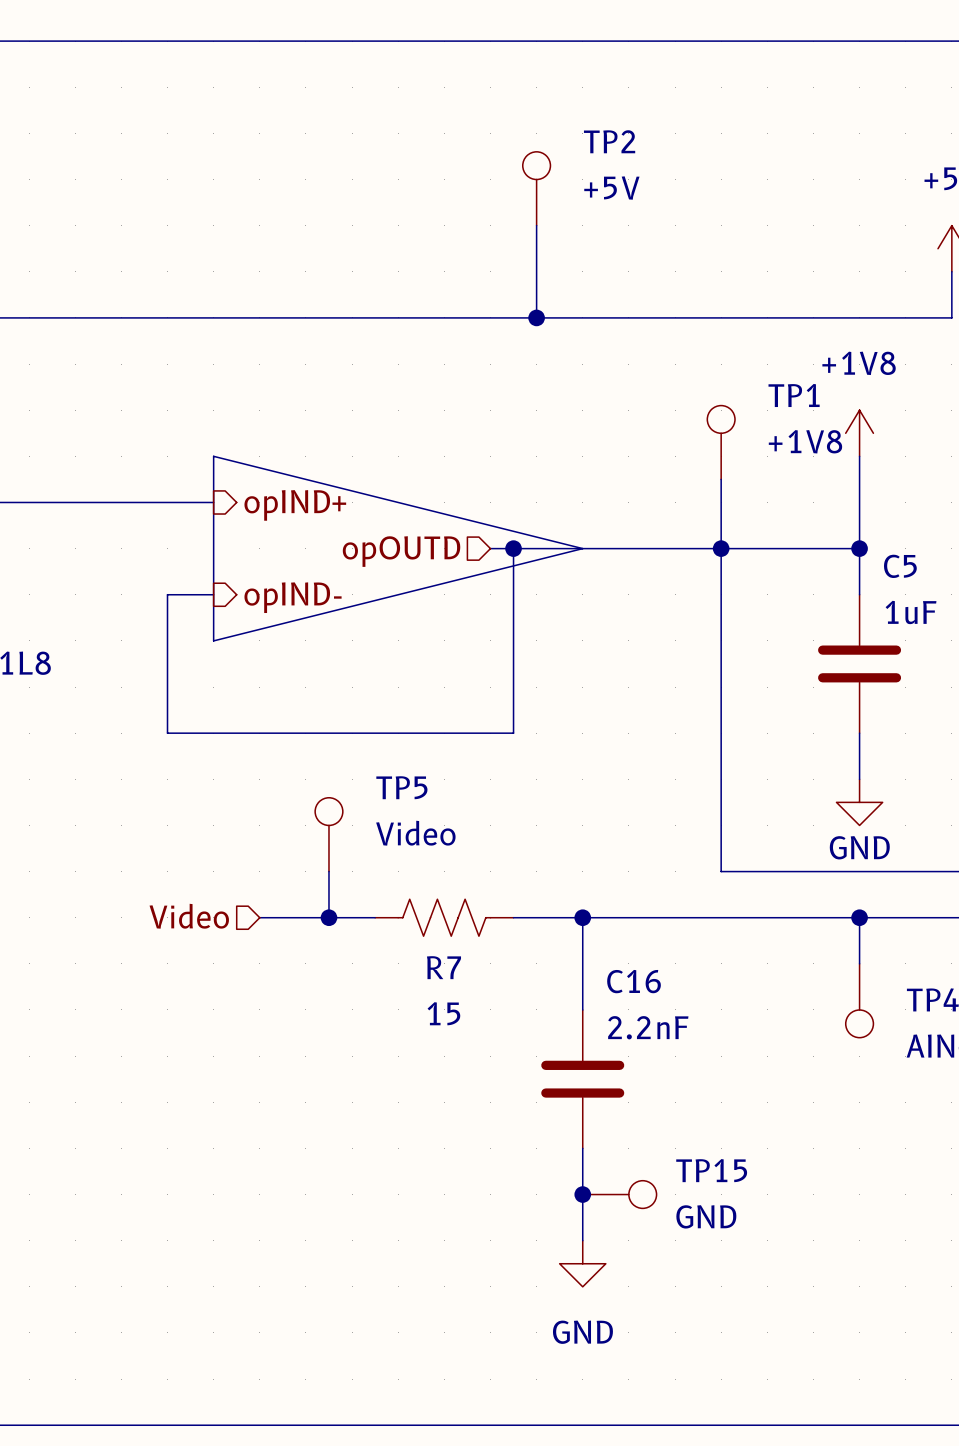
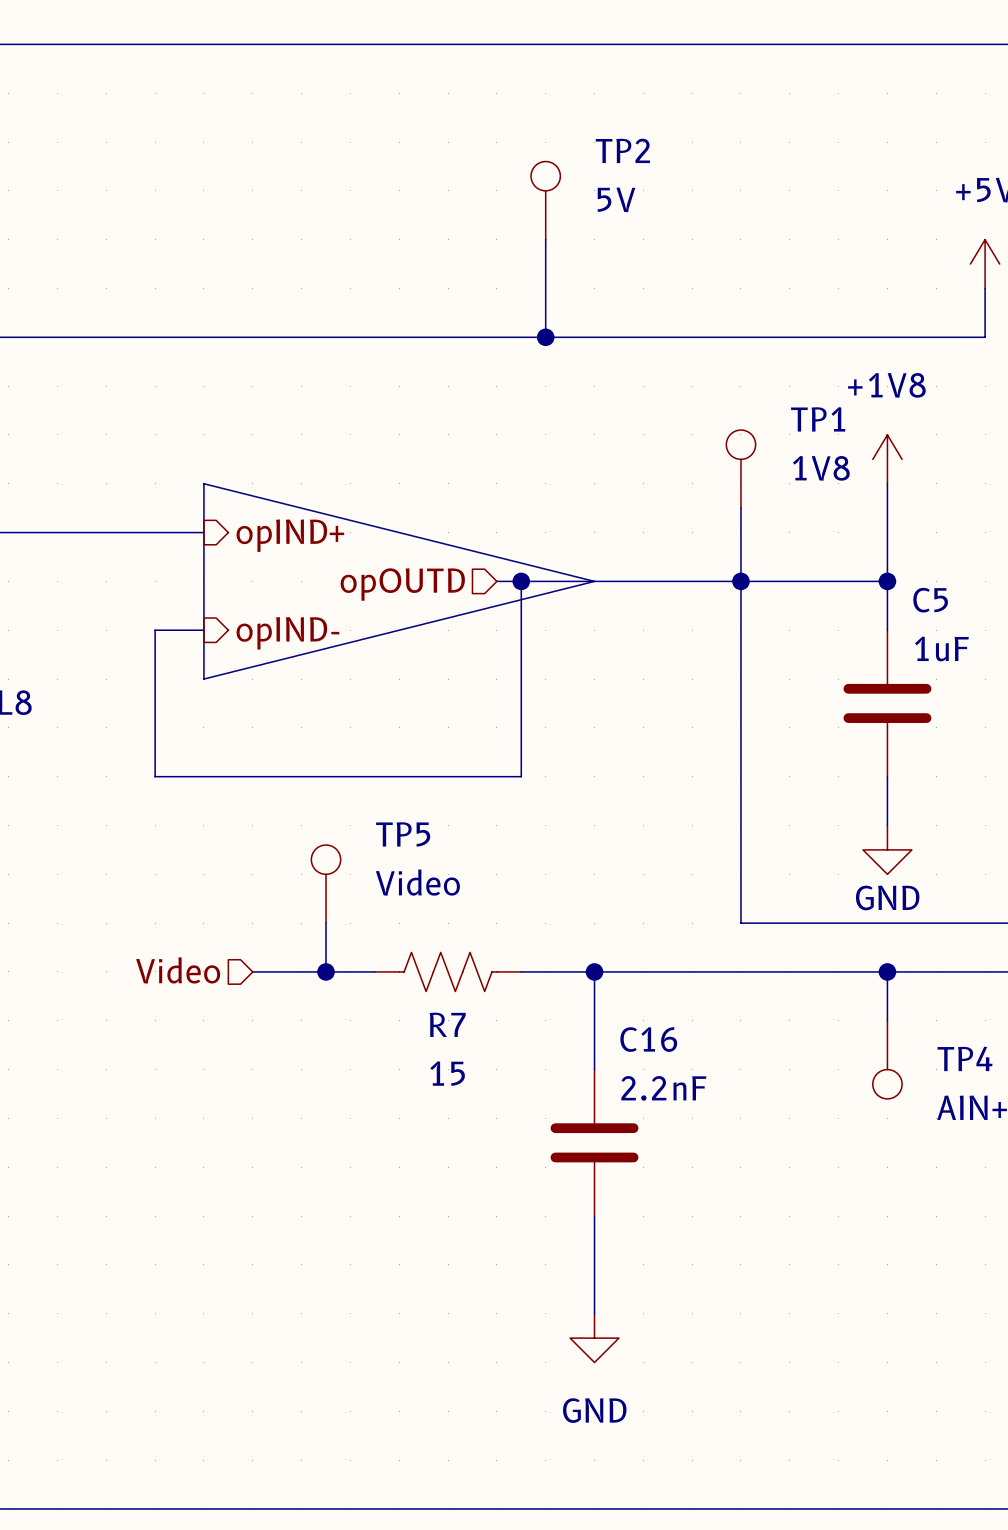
TP2 value: +5V (611, 188) -> 5V (616, 199)
TP1 value: +1V8 (805, 441) -> 1V8 (821, 468)
junction: (582, 1194) -> none
TP15: GND (619, 1194) -> none

